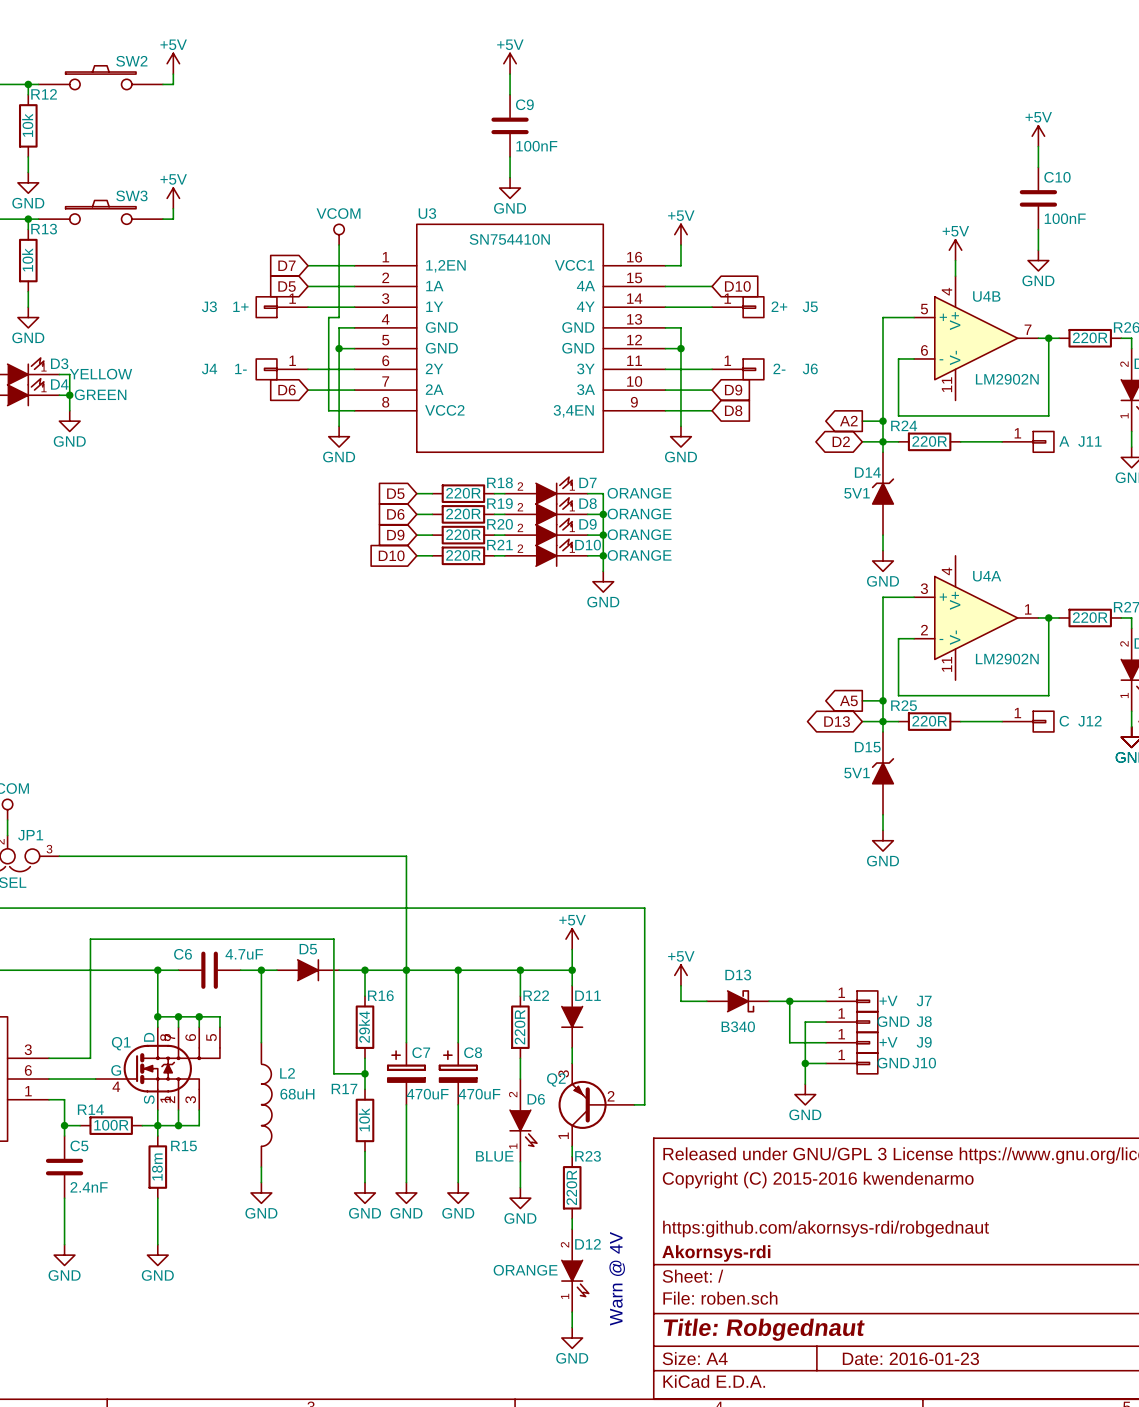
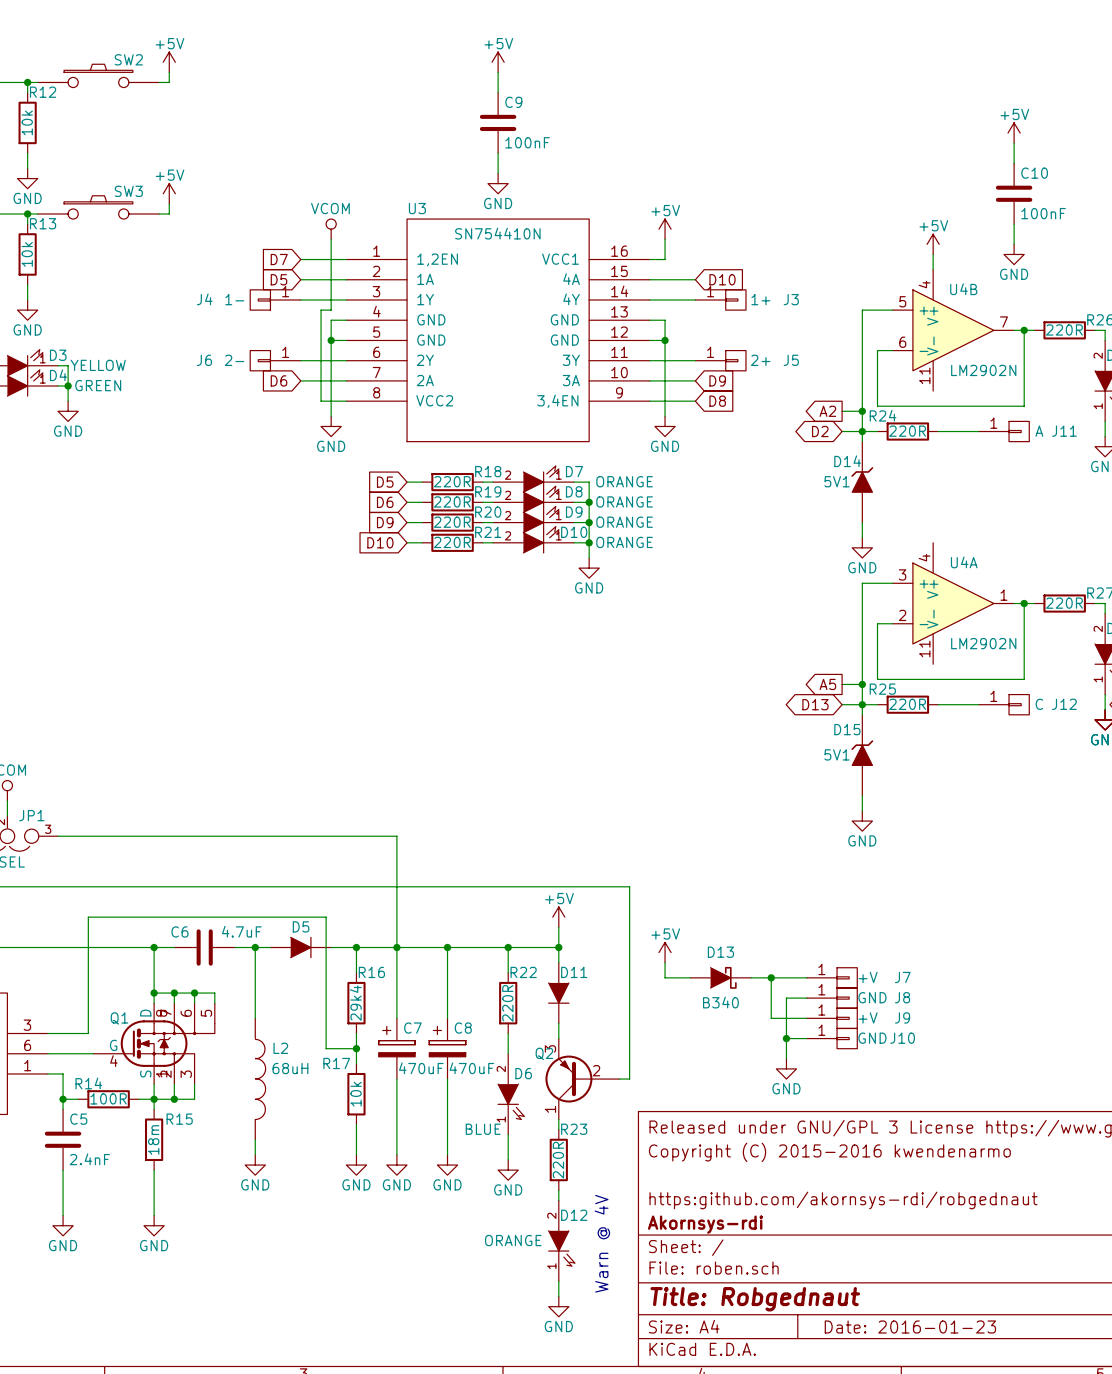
J3 name: J3 (209, 306) -> J4 (204, 299)
J3 value: 1+ (240, 306) -> 1- (234, 299)
J5 value: 2+ (779, 306) -> 1+ (760, 299)
J5 name: J5 (810, 306) -> J3 (791, 299)
J4 value: 1- (240, 368) -> 2- (234, 360)
J6 value: 2- (779, 368) -> 2+ (760, 360)
J6 name: J6 (810, 368) -> J5 (791, 360)
J4 name: J4 (209, 369) -> J6 (204, 360)

